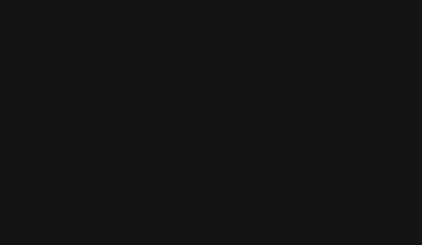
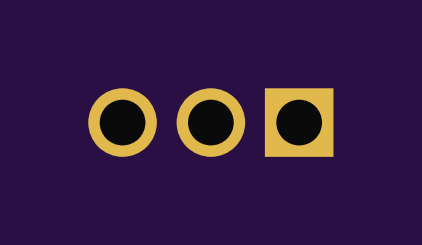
part: none -> (210, 122)

